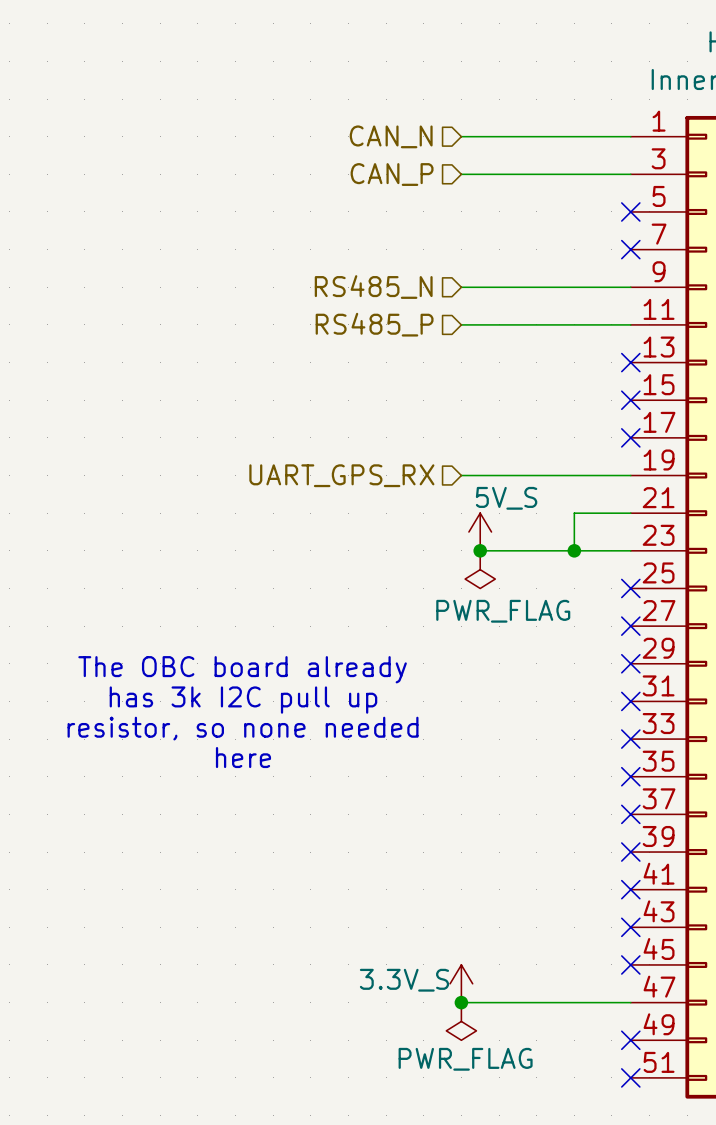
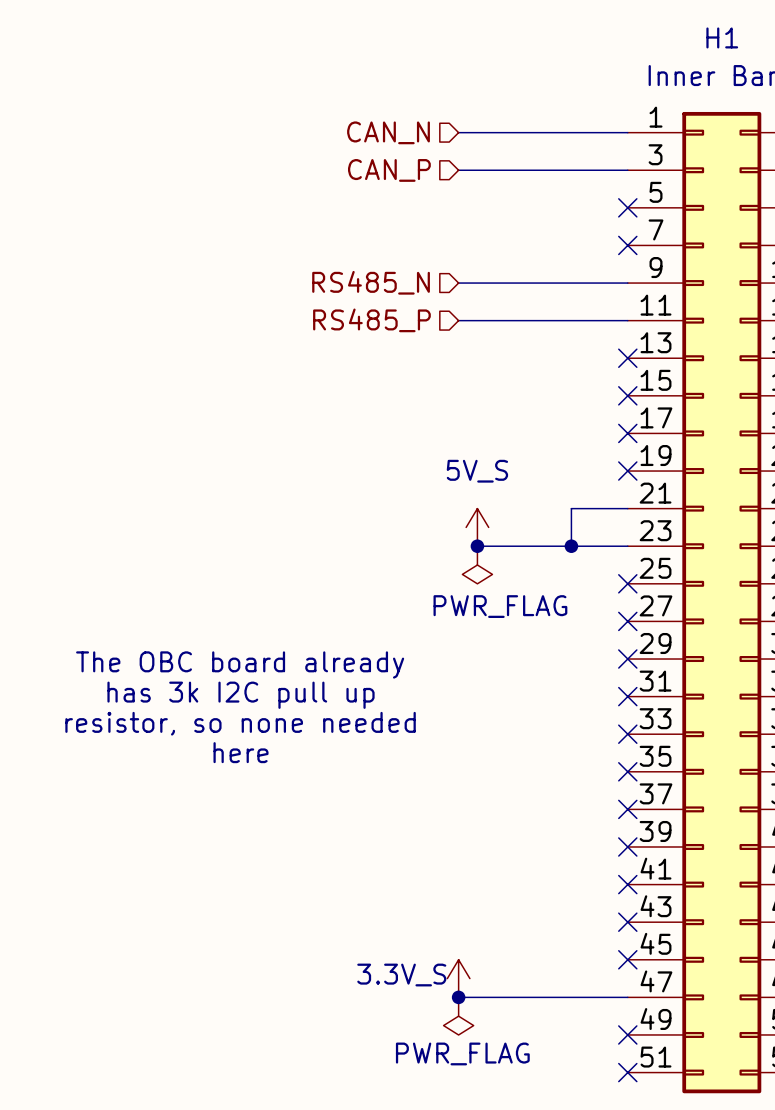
hierarchical label: UART_GPS_RX (341, 475) -> none
wire: (461, 475) (630, 475) -> none
no-connect mark: none -> (627, 471)
power symbol text position: 5V_S (506, 498) -> 5V_S (477, 471)

